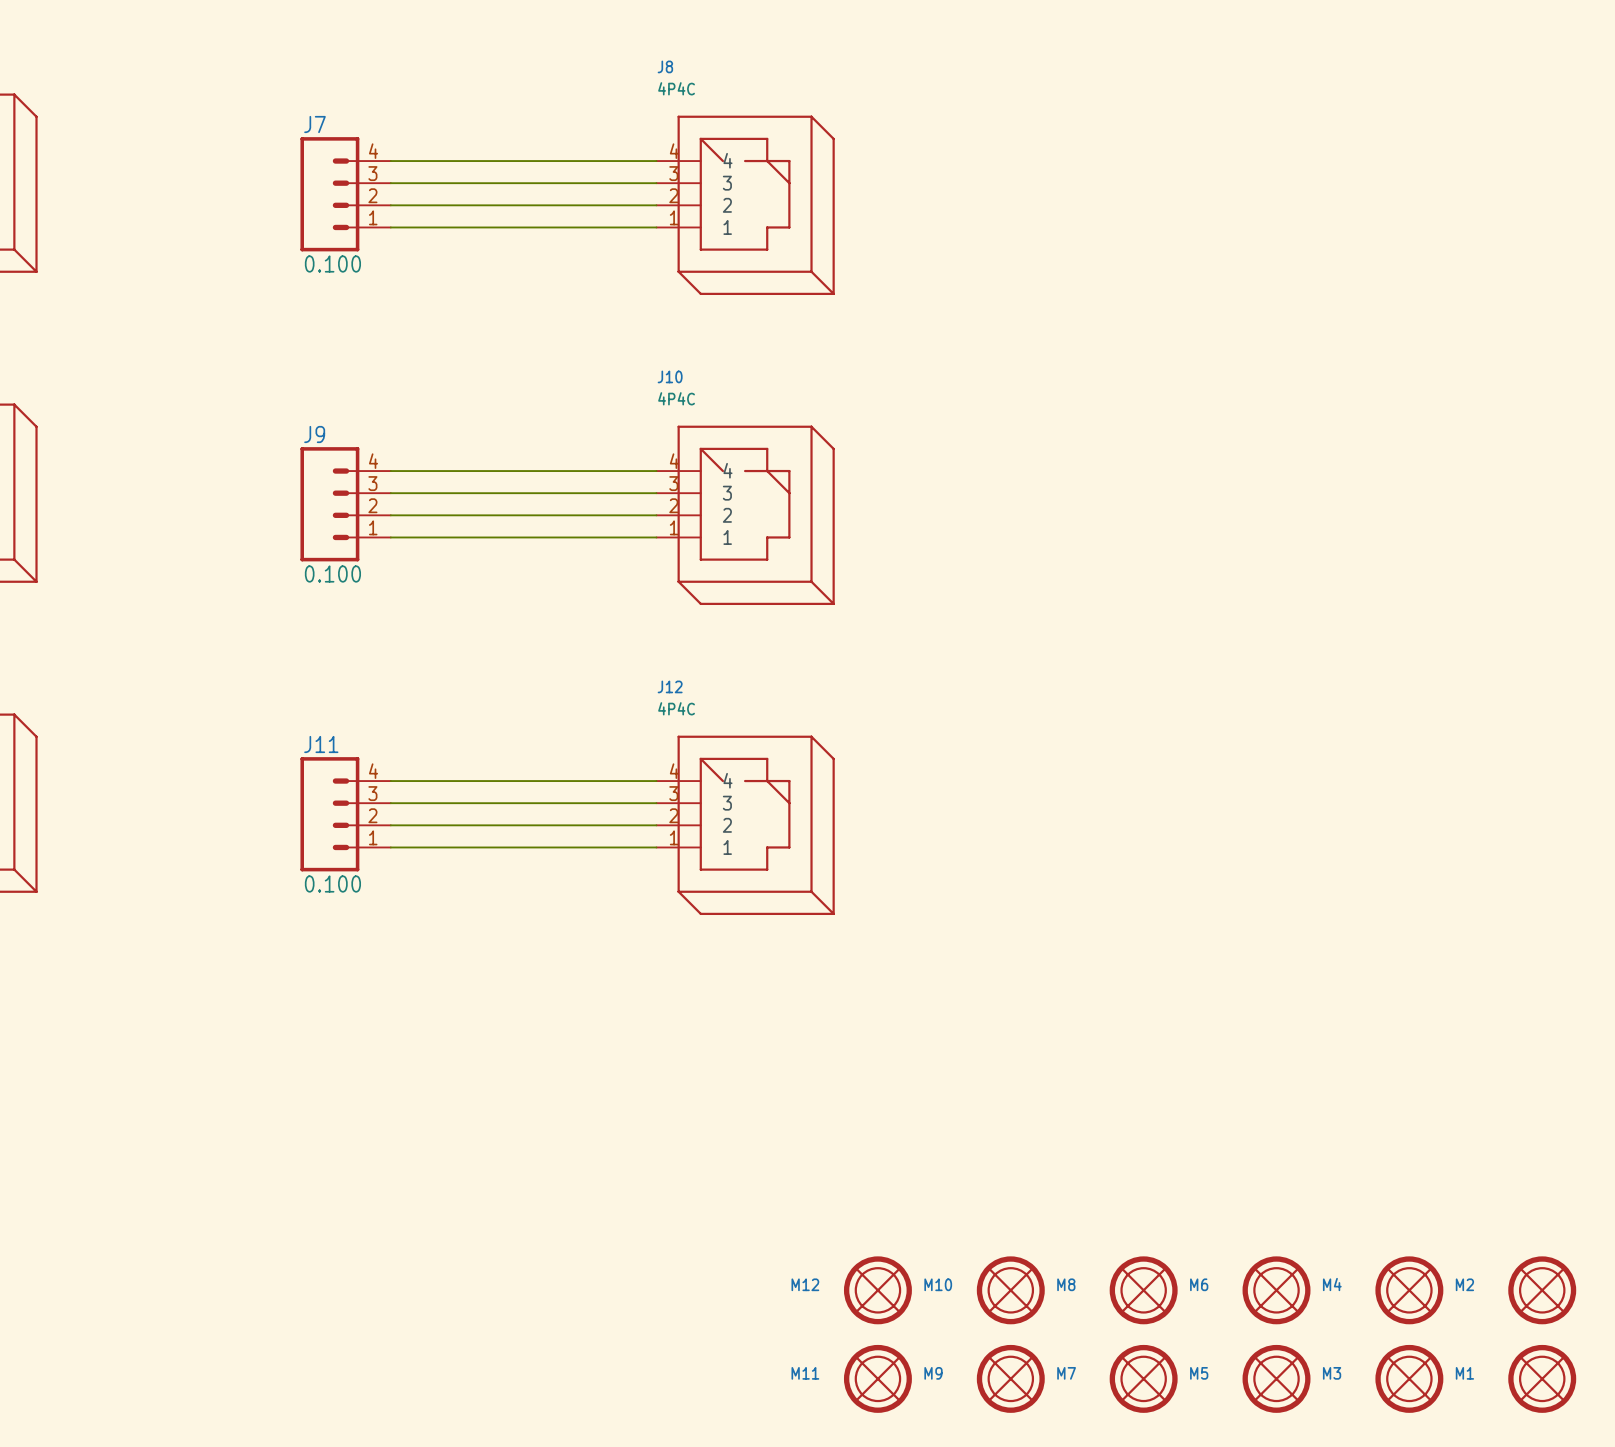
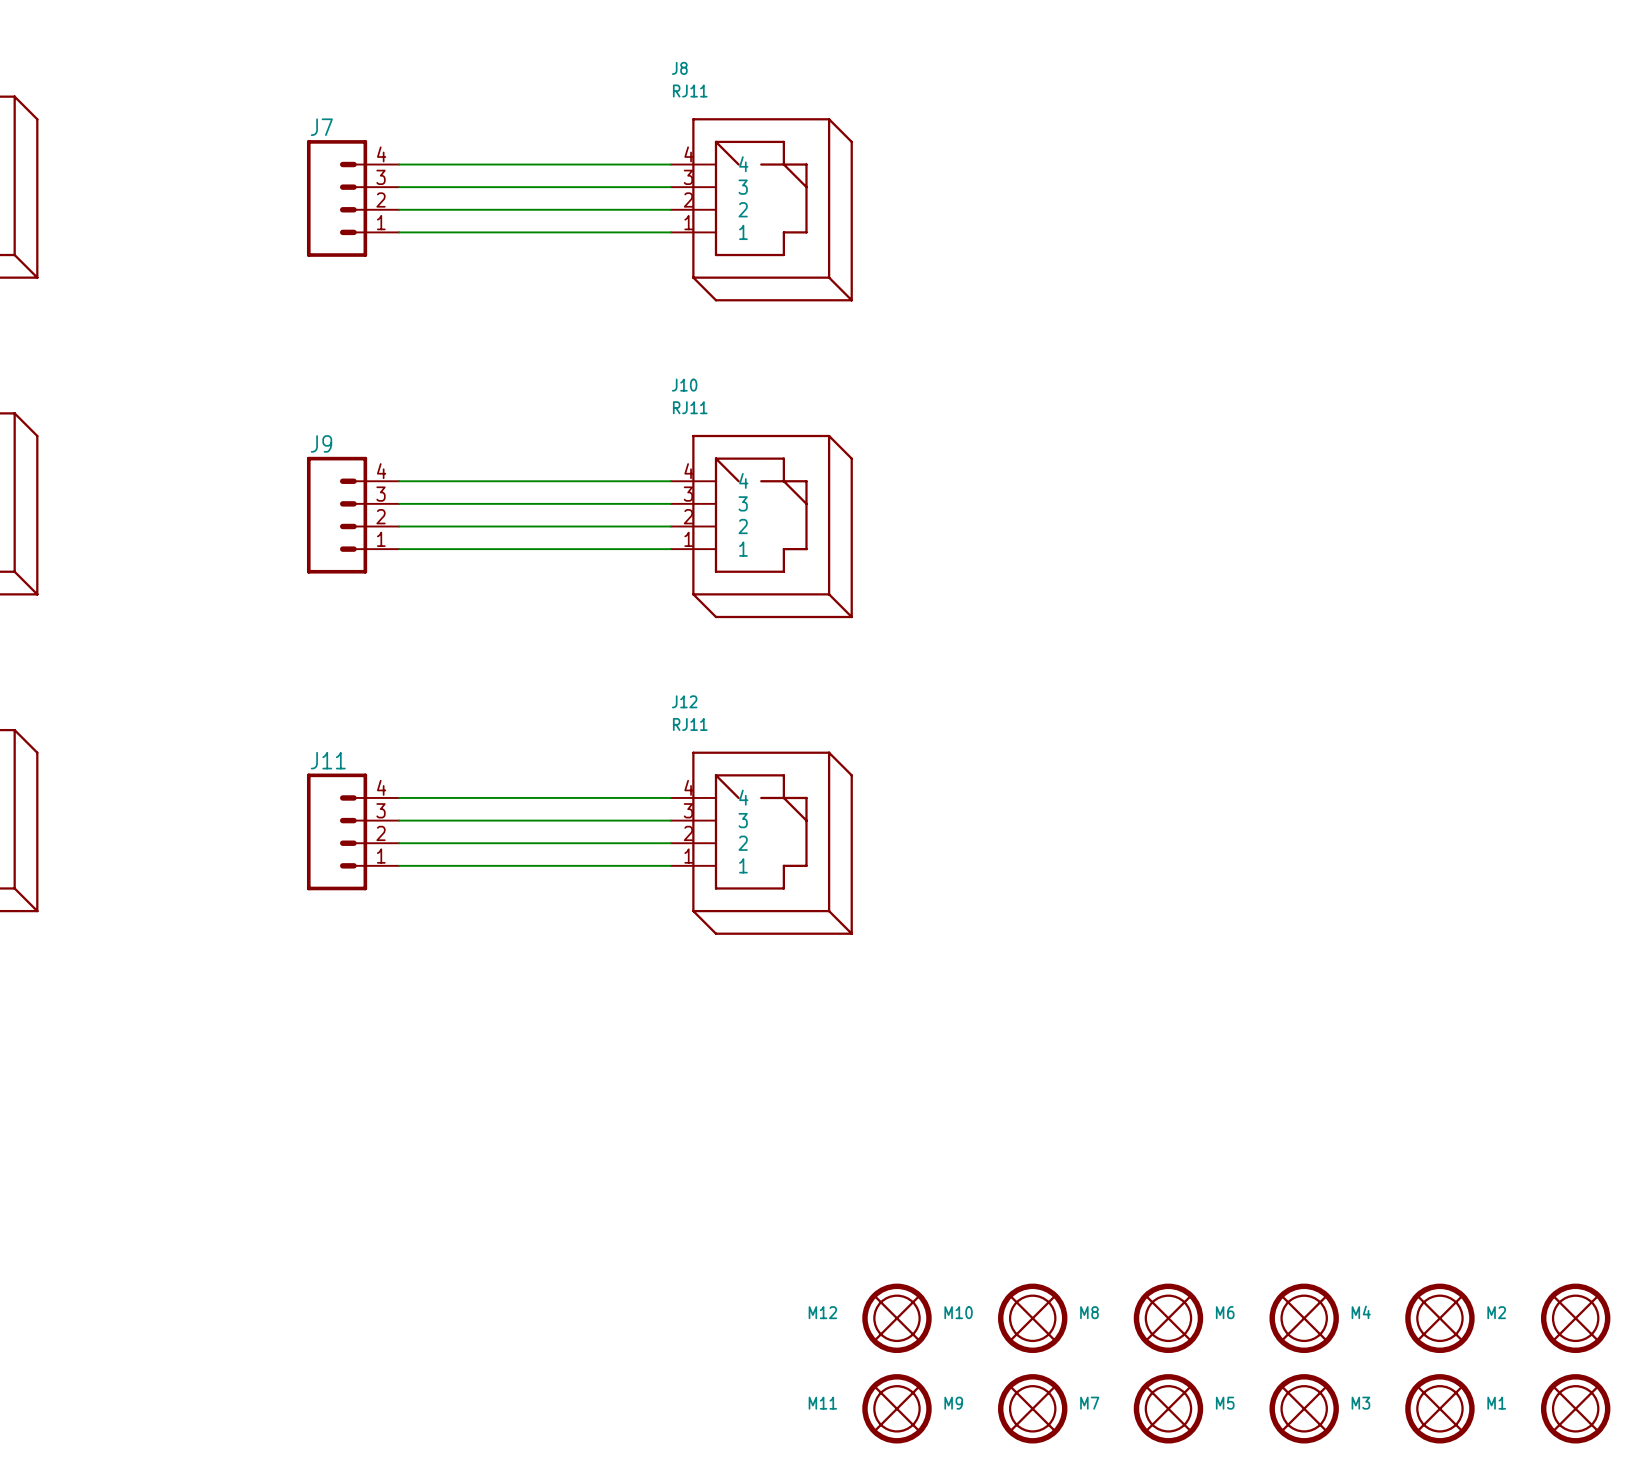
J8 value: 4P4C (676, 88) -> RJ11 (690, 91)
J7 value: 0.100 (332, 264) -> none
J10 value: 4P4C (676, 398) -> RJ11 (690, 407)
J9 value: 0.100 (332, 574) -> none
J12 value: 4P4C (676, 708) -> RJ11 (690, 724)
J11 value: 0.100 (332, 884) -> none

